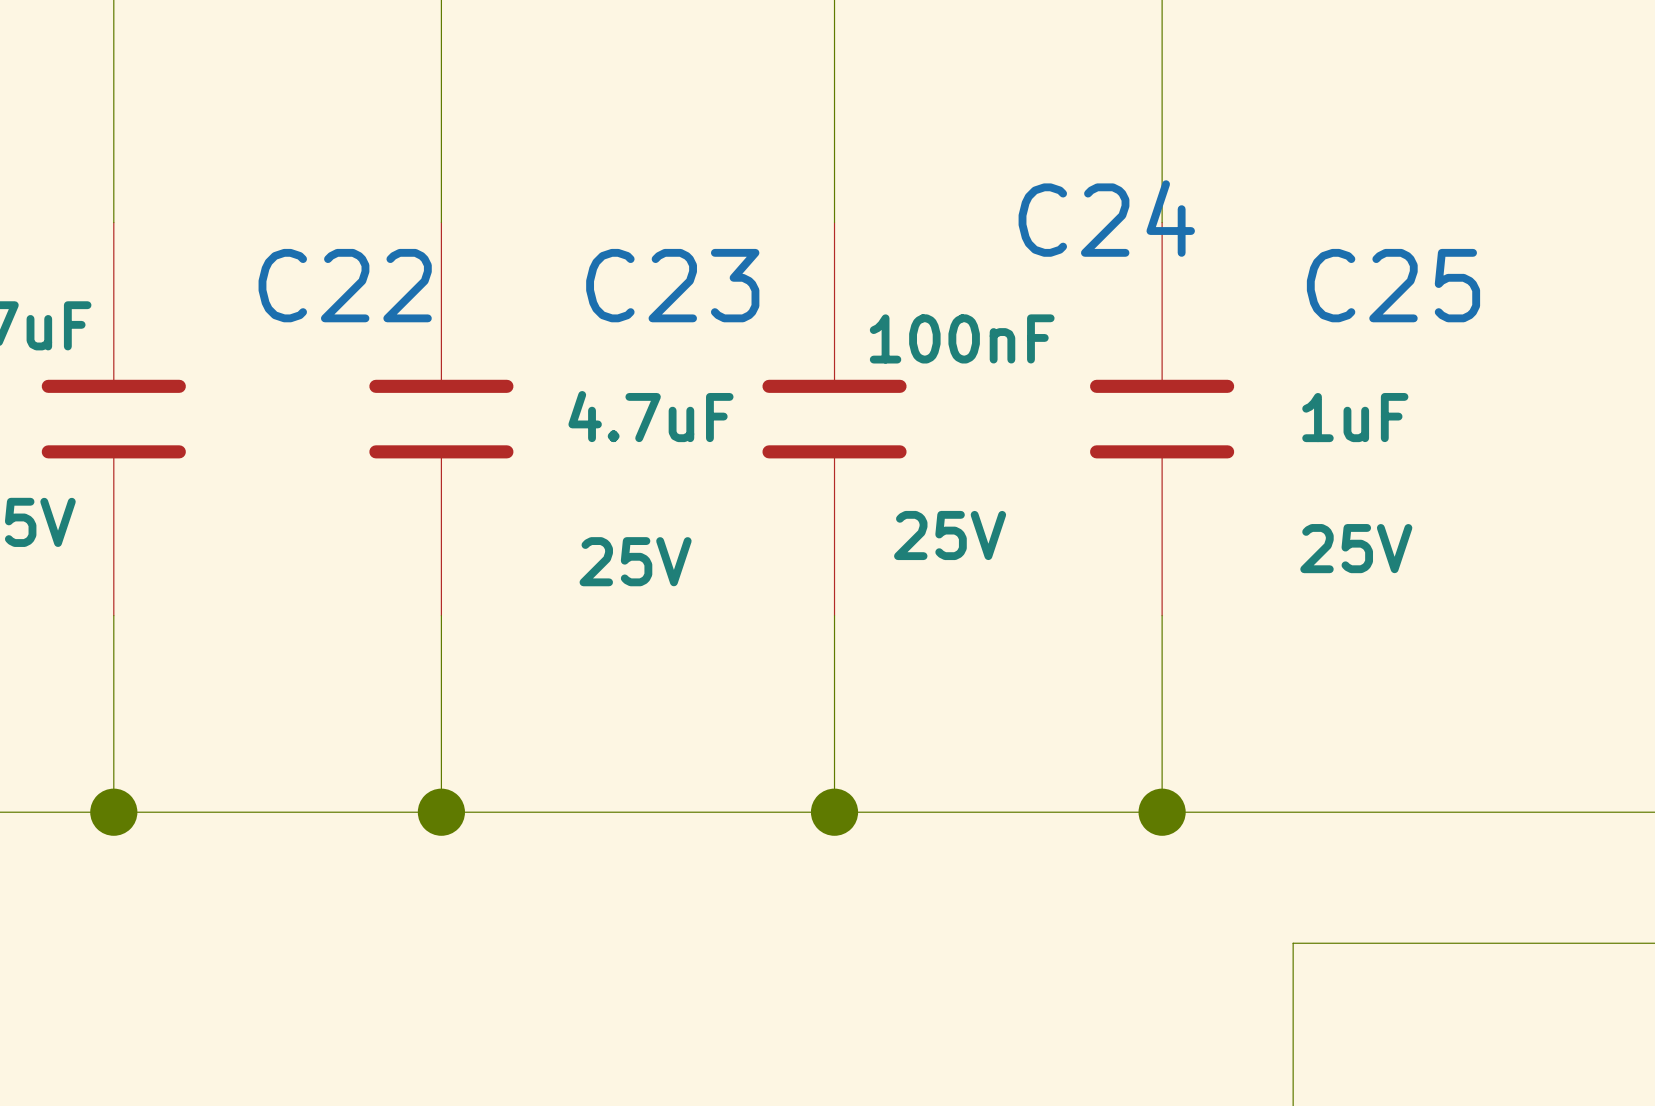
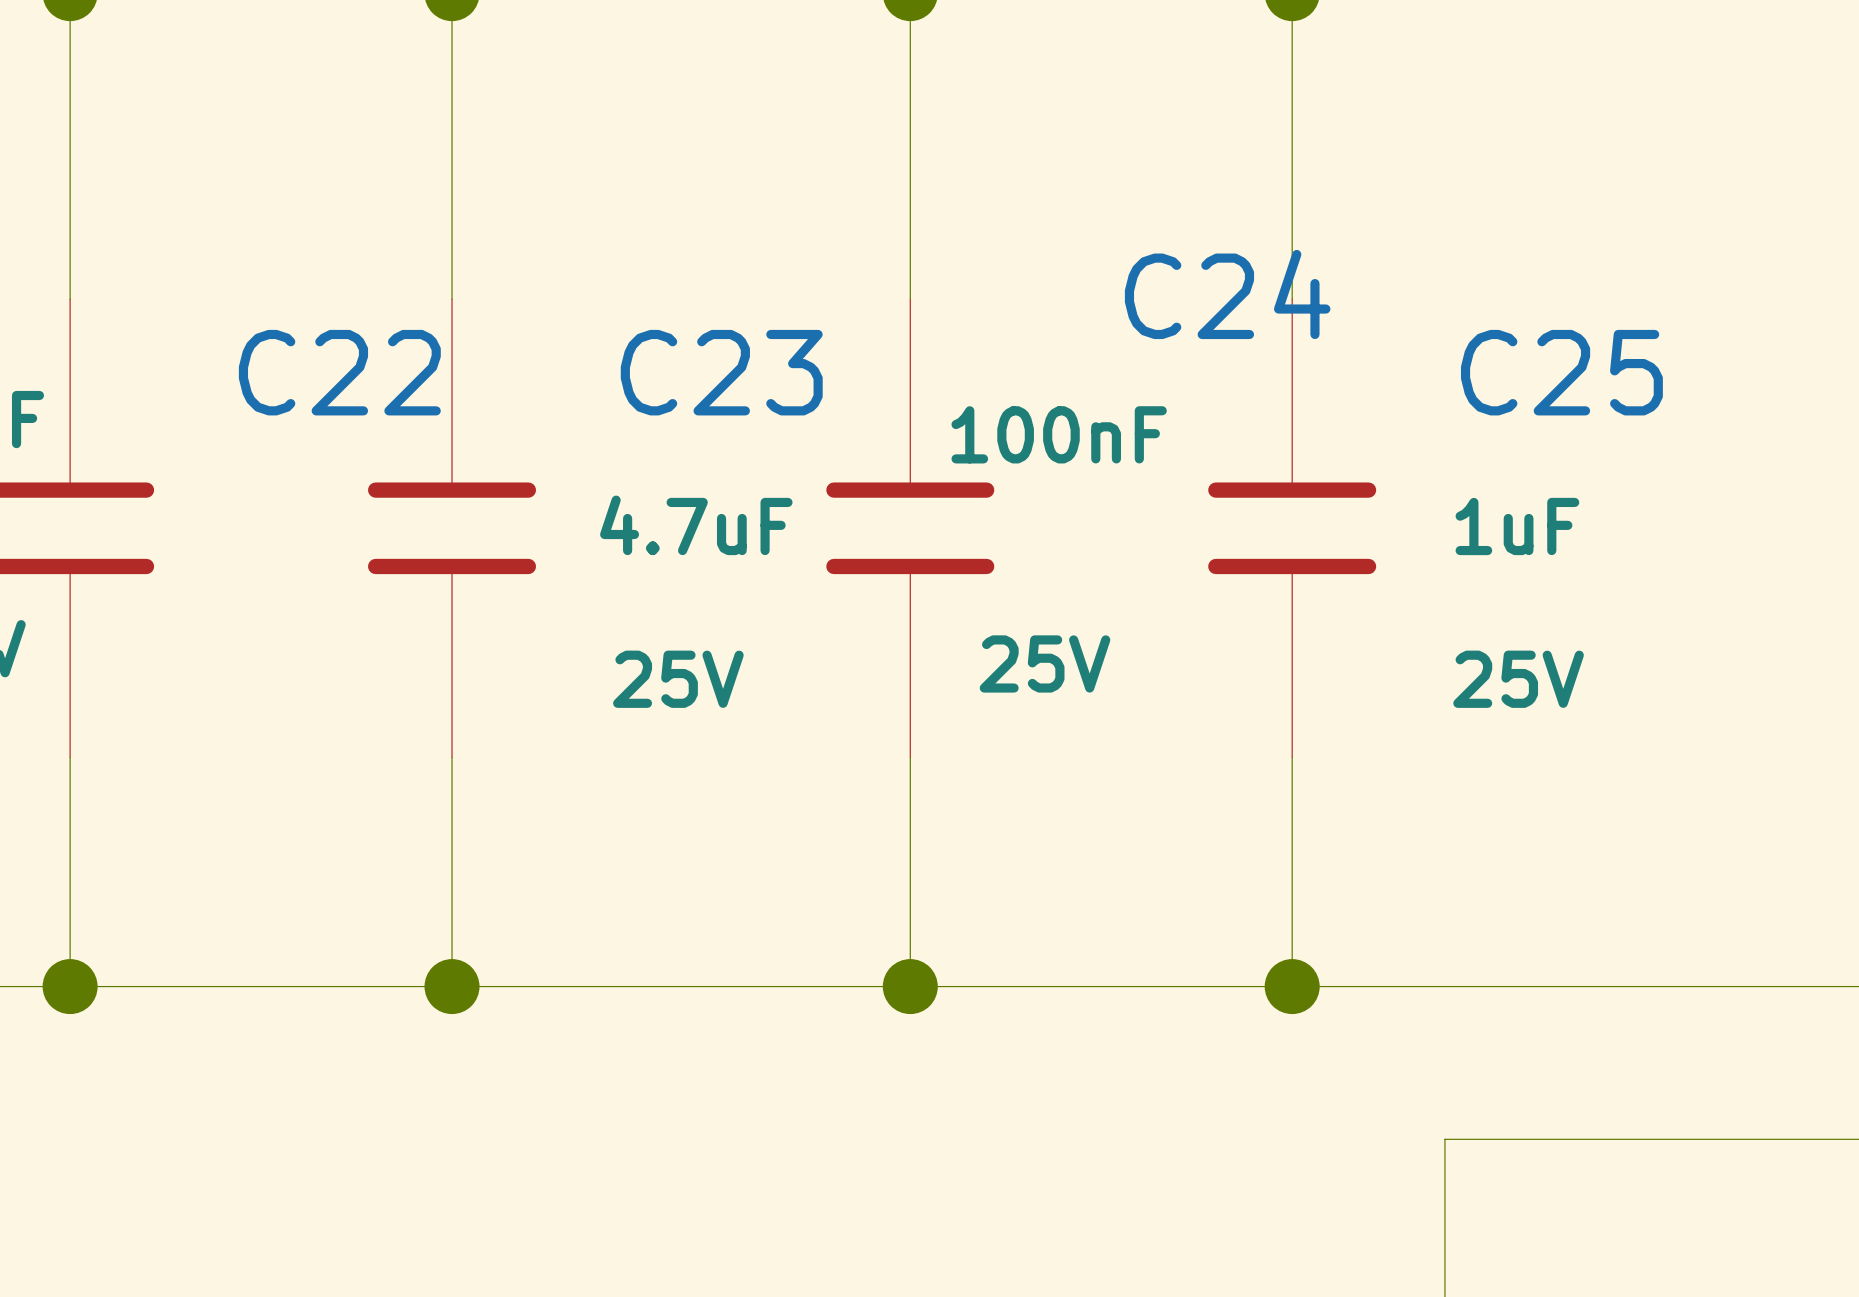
C23 text position: 25V (635, 561) -> 25V (678, 679)

